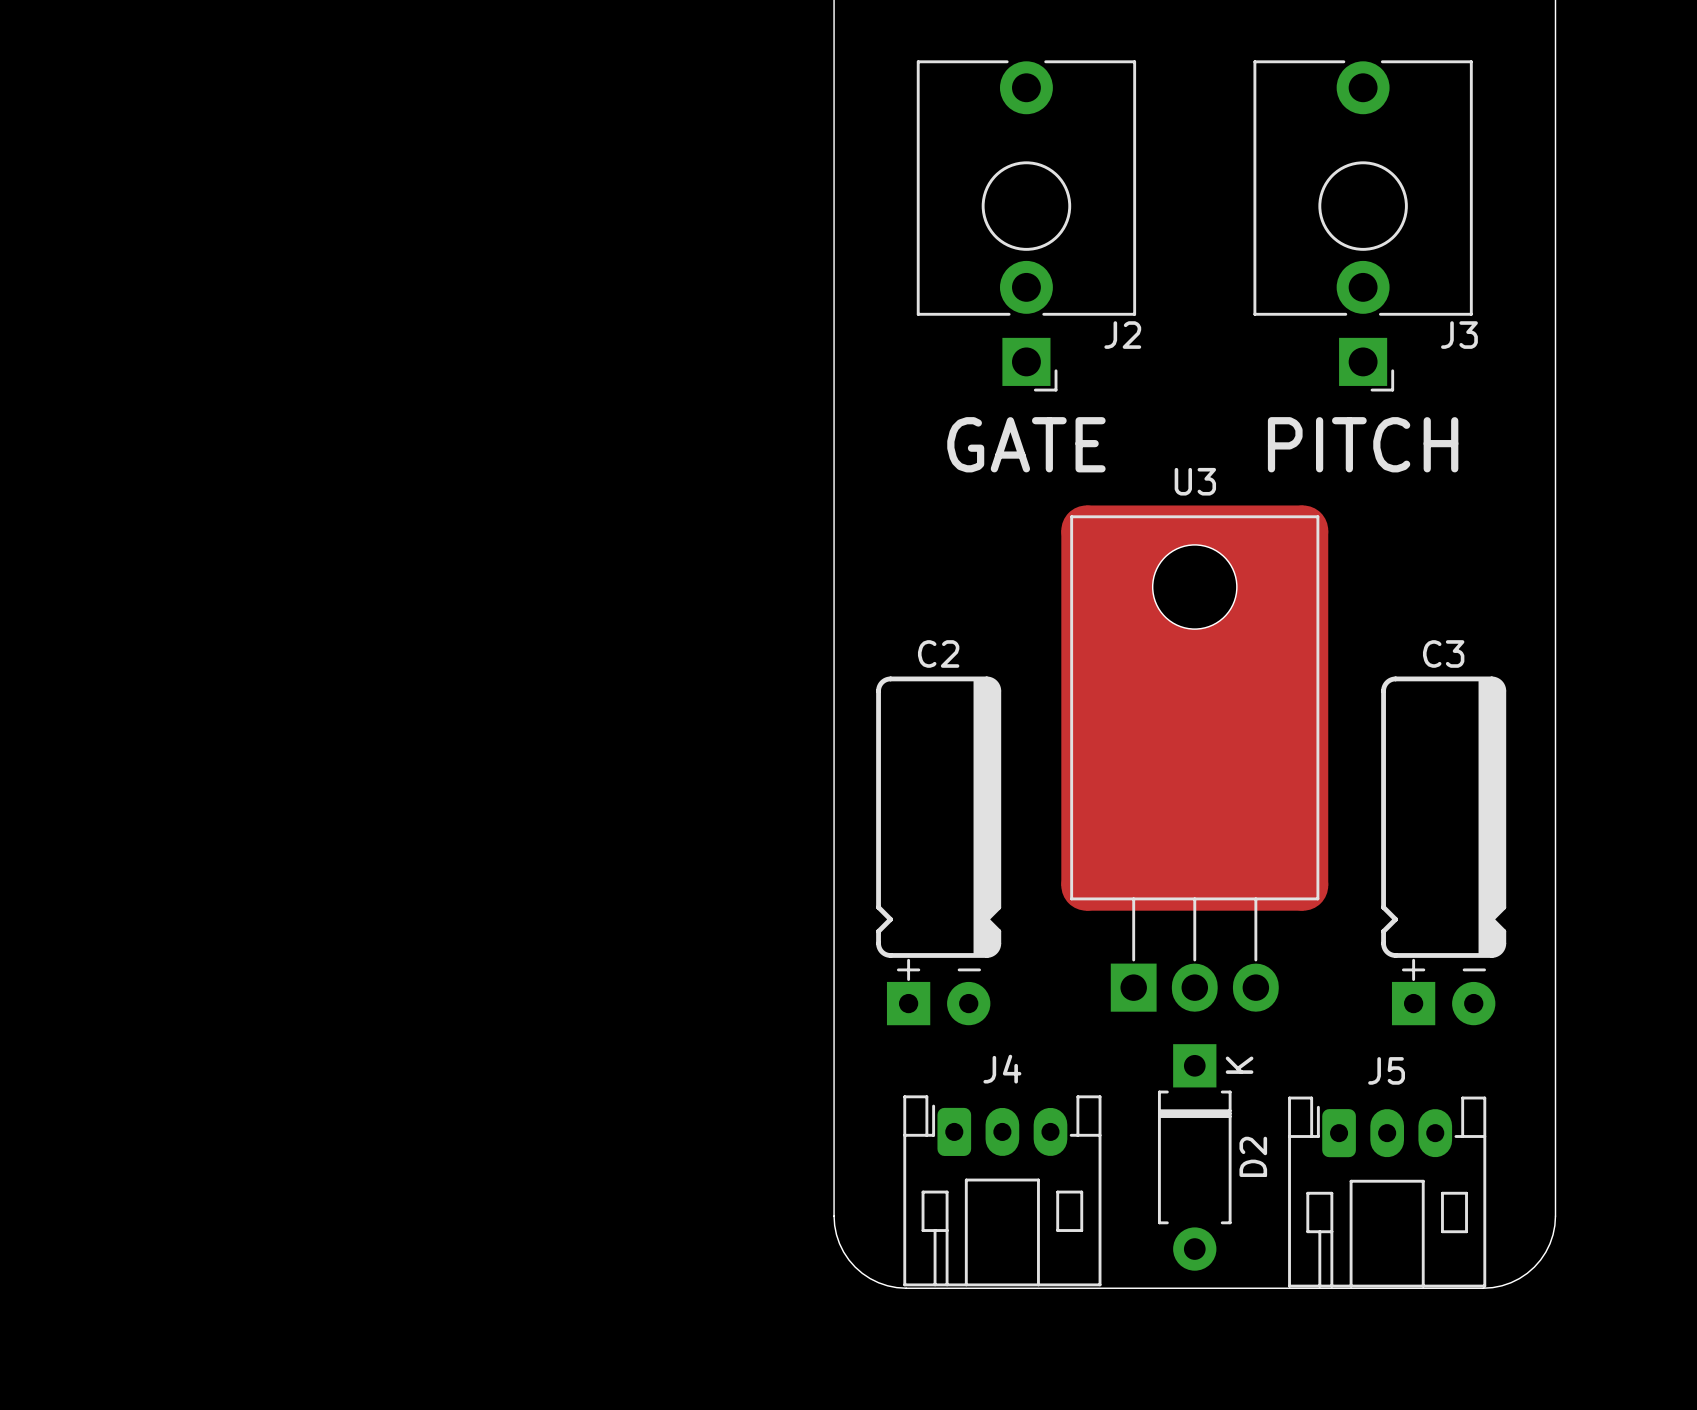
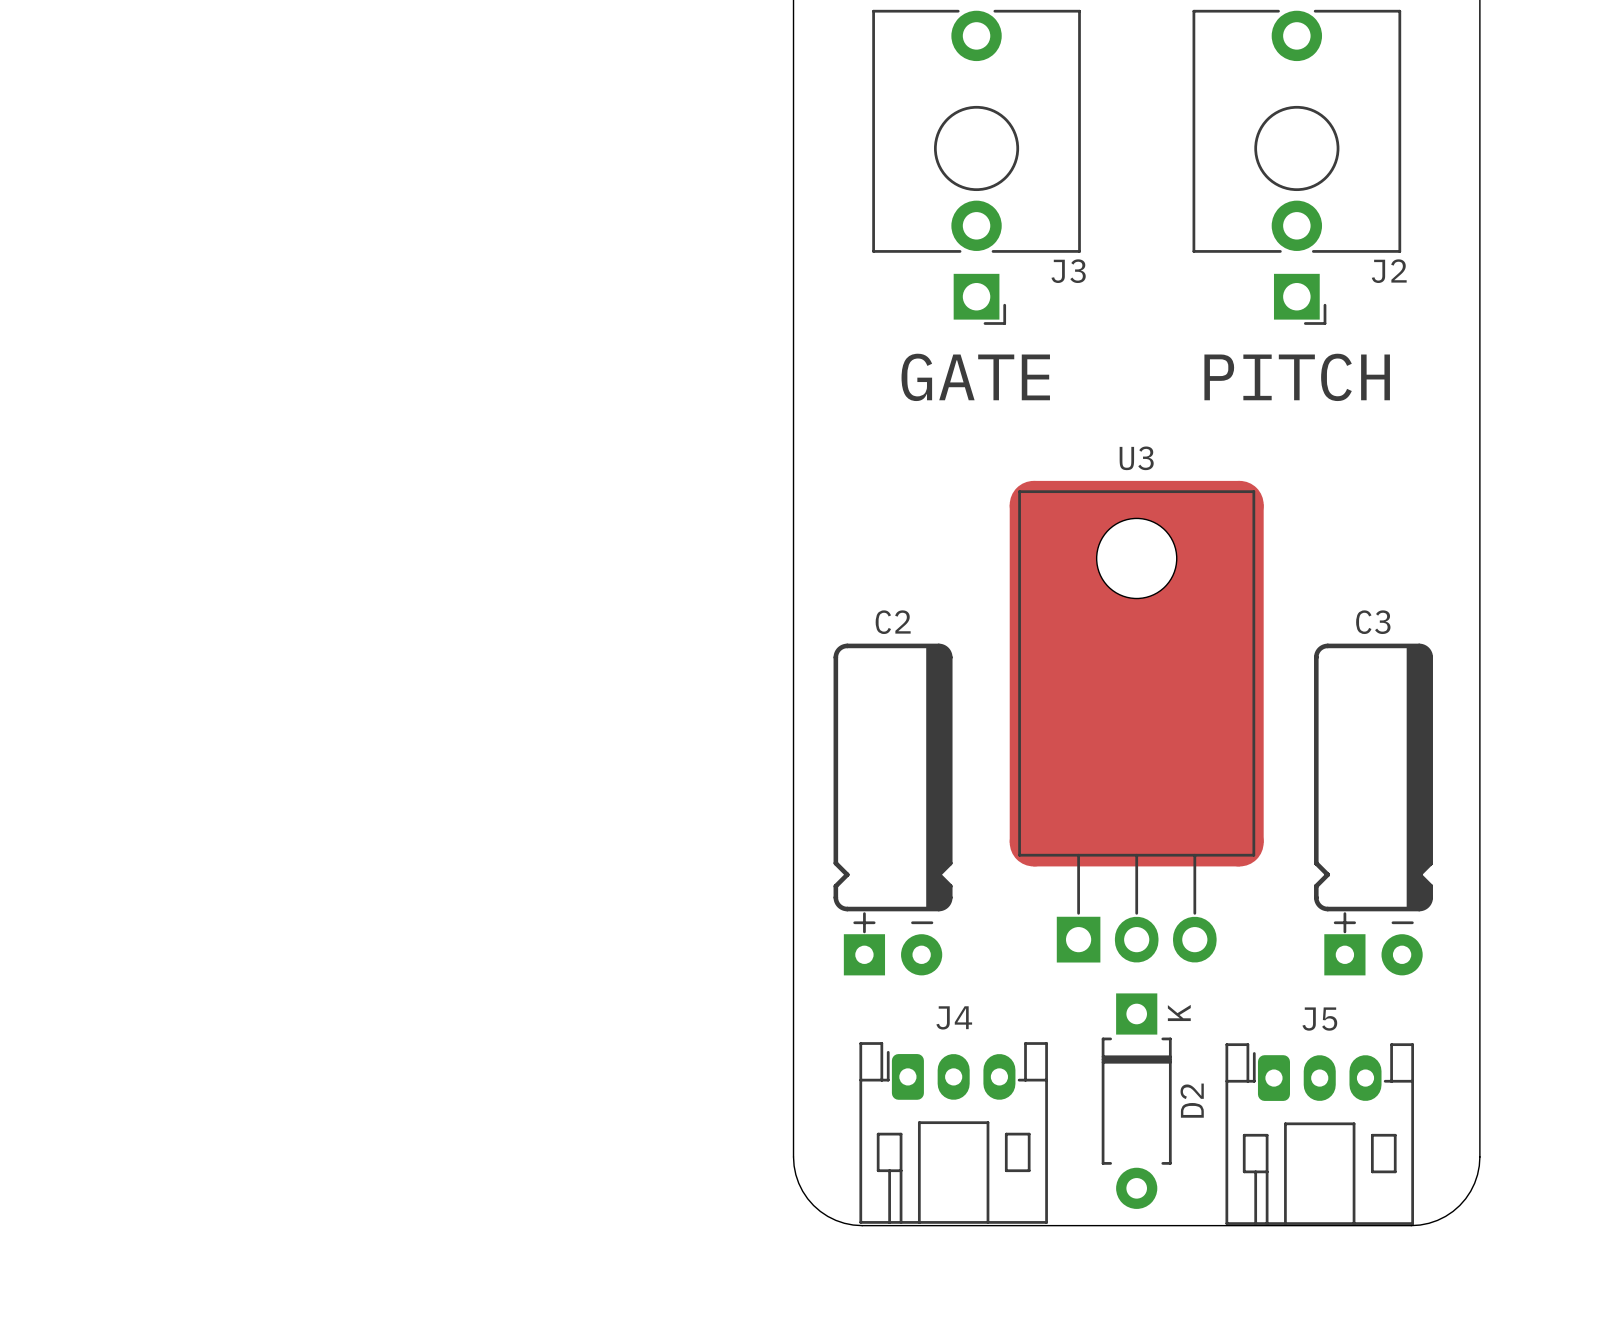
J2 position: (1026, 225) -> (1296, 167)
J3 position: (1363, 225) -> (976, 167)
text position: GATE (1026, 444) -> GATE (975, 377)
text position: PITCH (1363, 444) -> PITCH (1297, 377)

